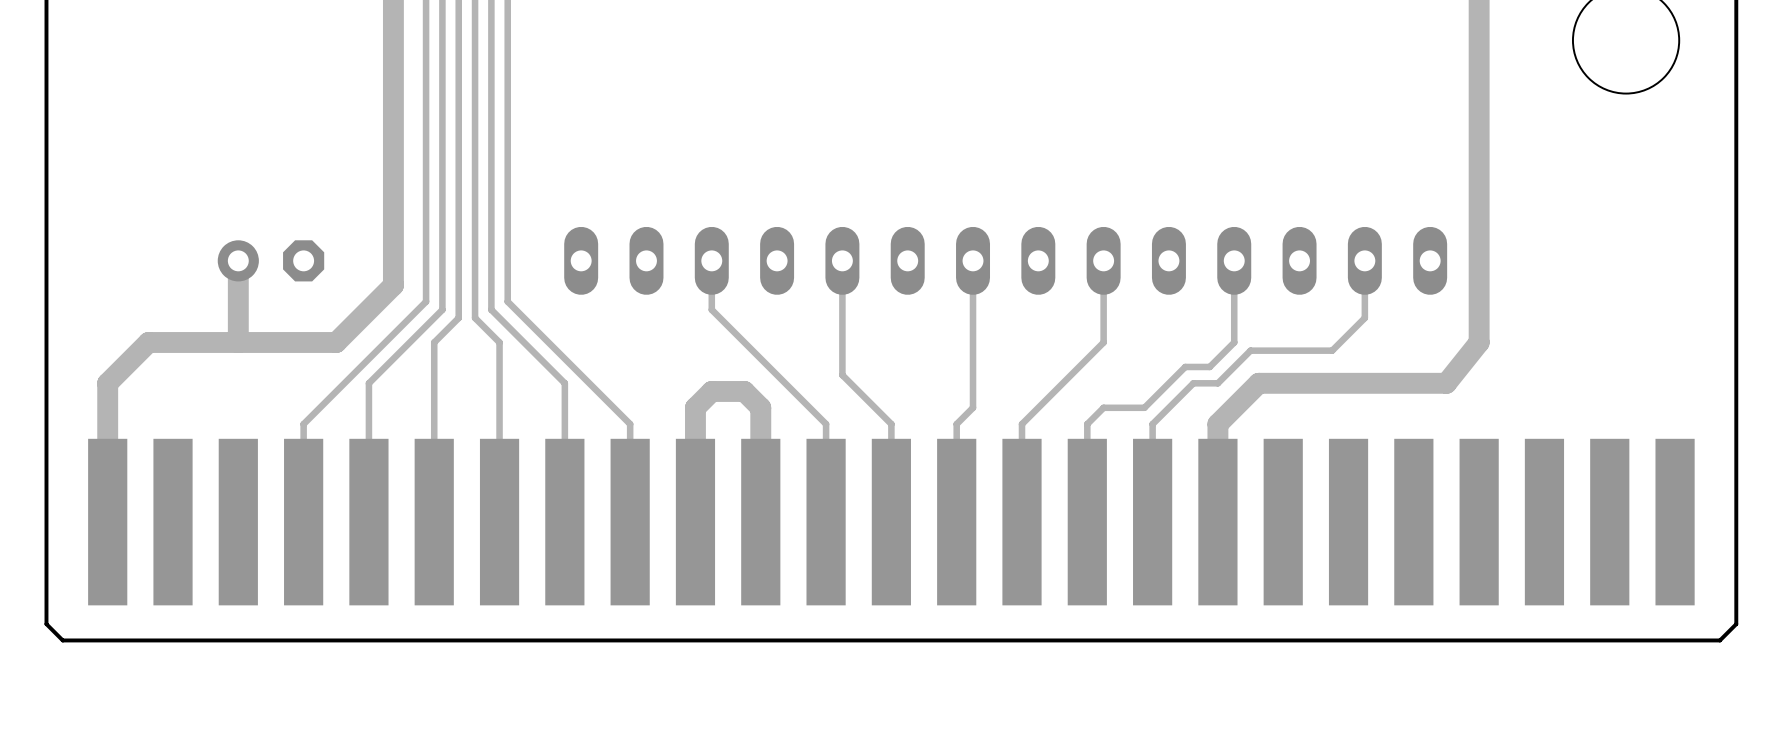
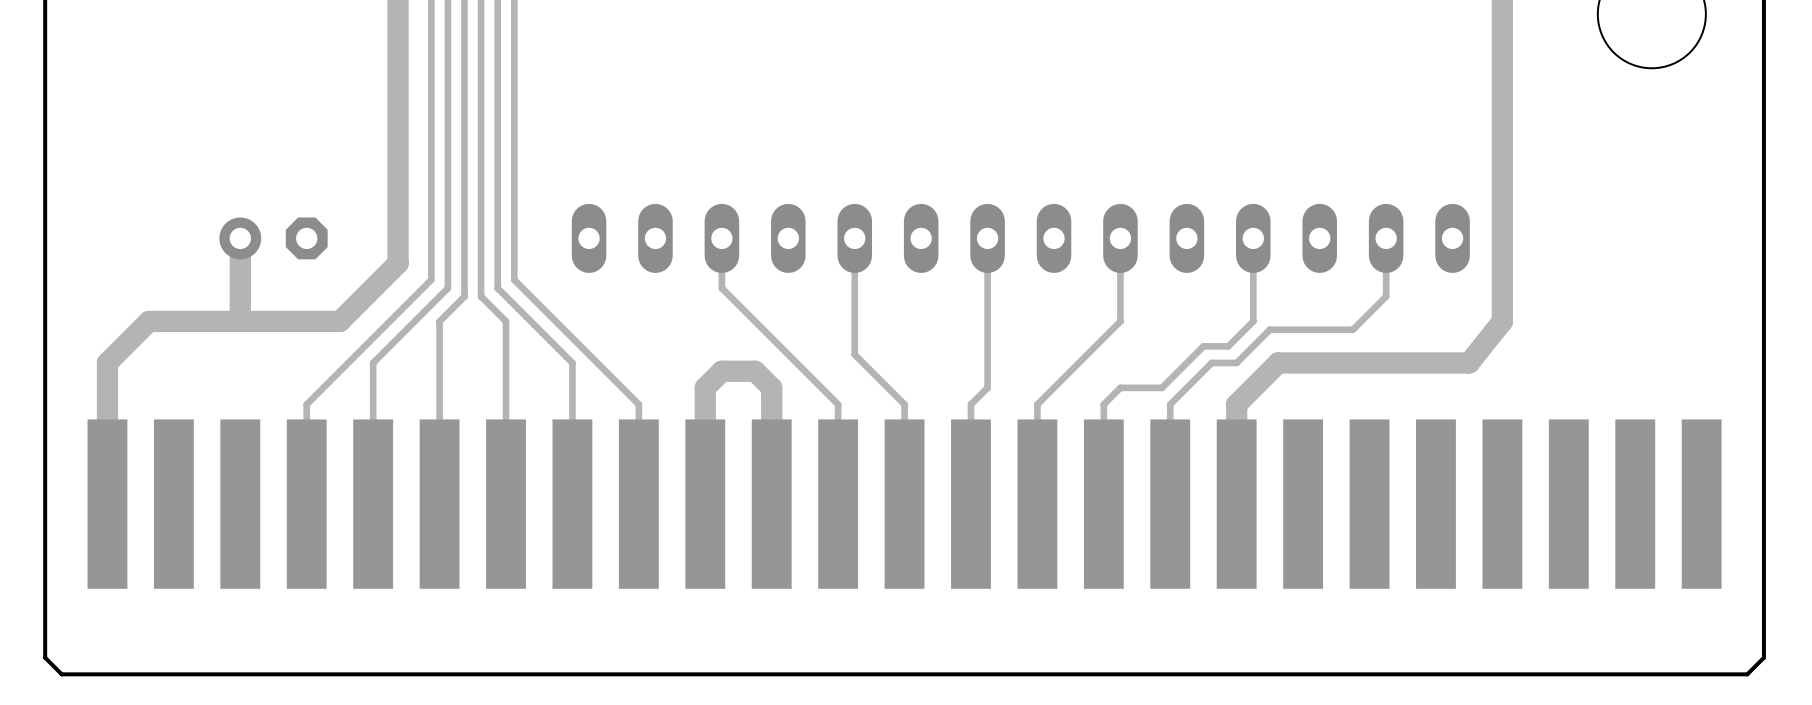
board edge: (1736, 624) (1719, 640) (62, 640) (46, 624) -> (1763, 607) (1763, 657) (1747, 674) (61, 674) (45, 657) (45, 607)

